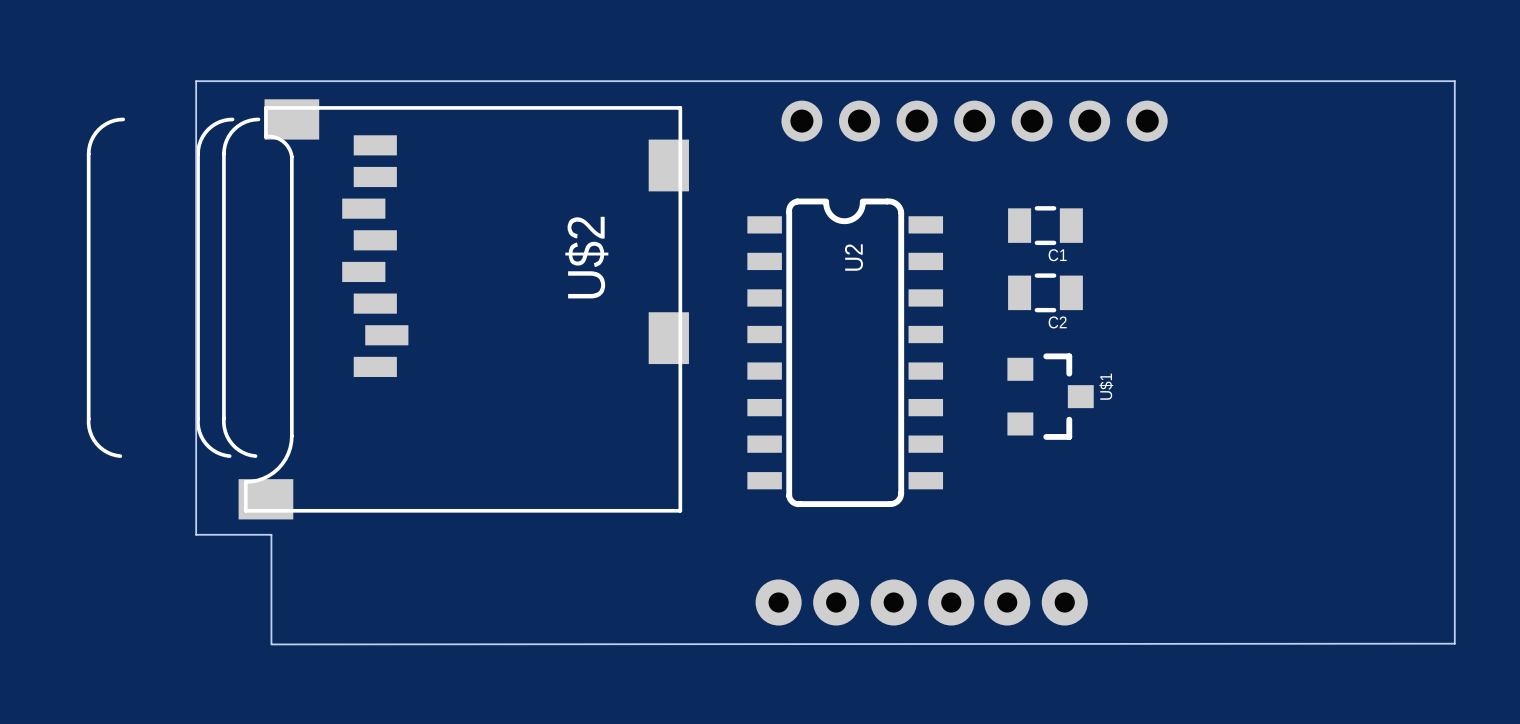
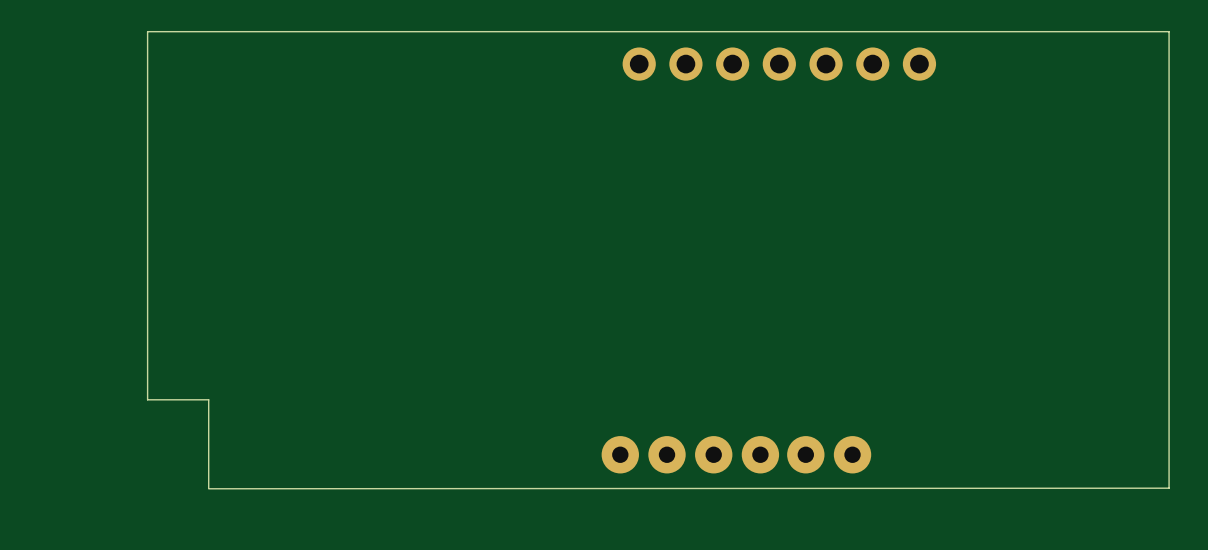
C1: (1045, 225) -> none
C2: (1045, 292) -> none
U$2: (387, 309) -> none
U2: (845, 352) -> none
U$1: (1050, 396) -> none

